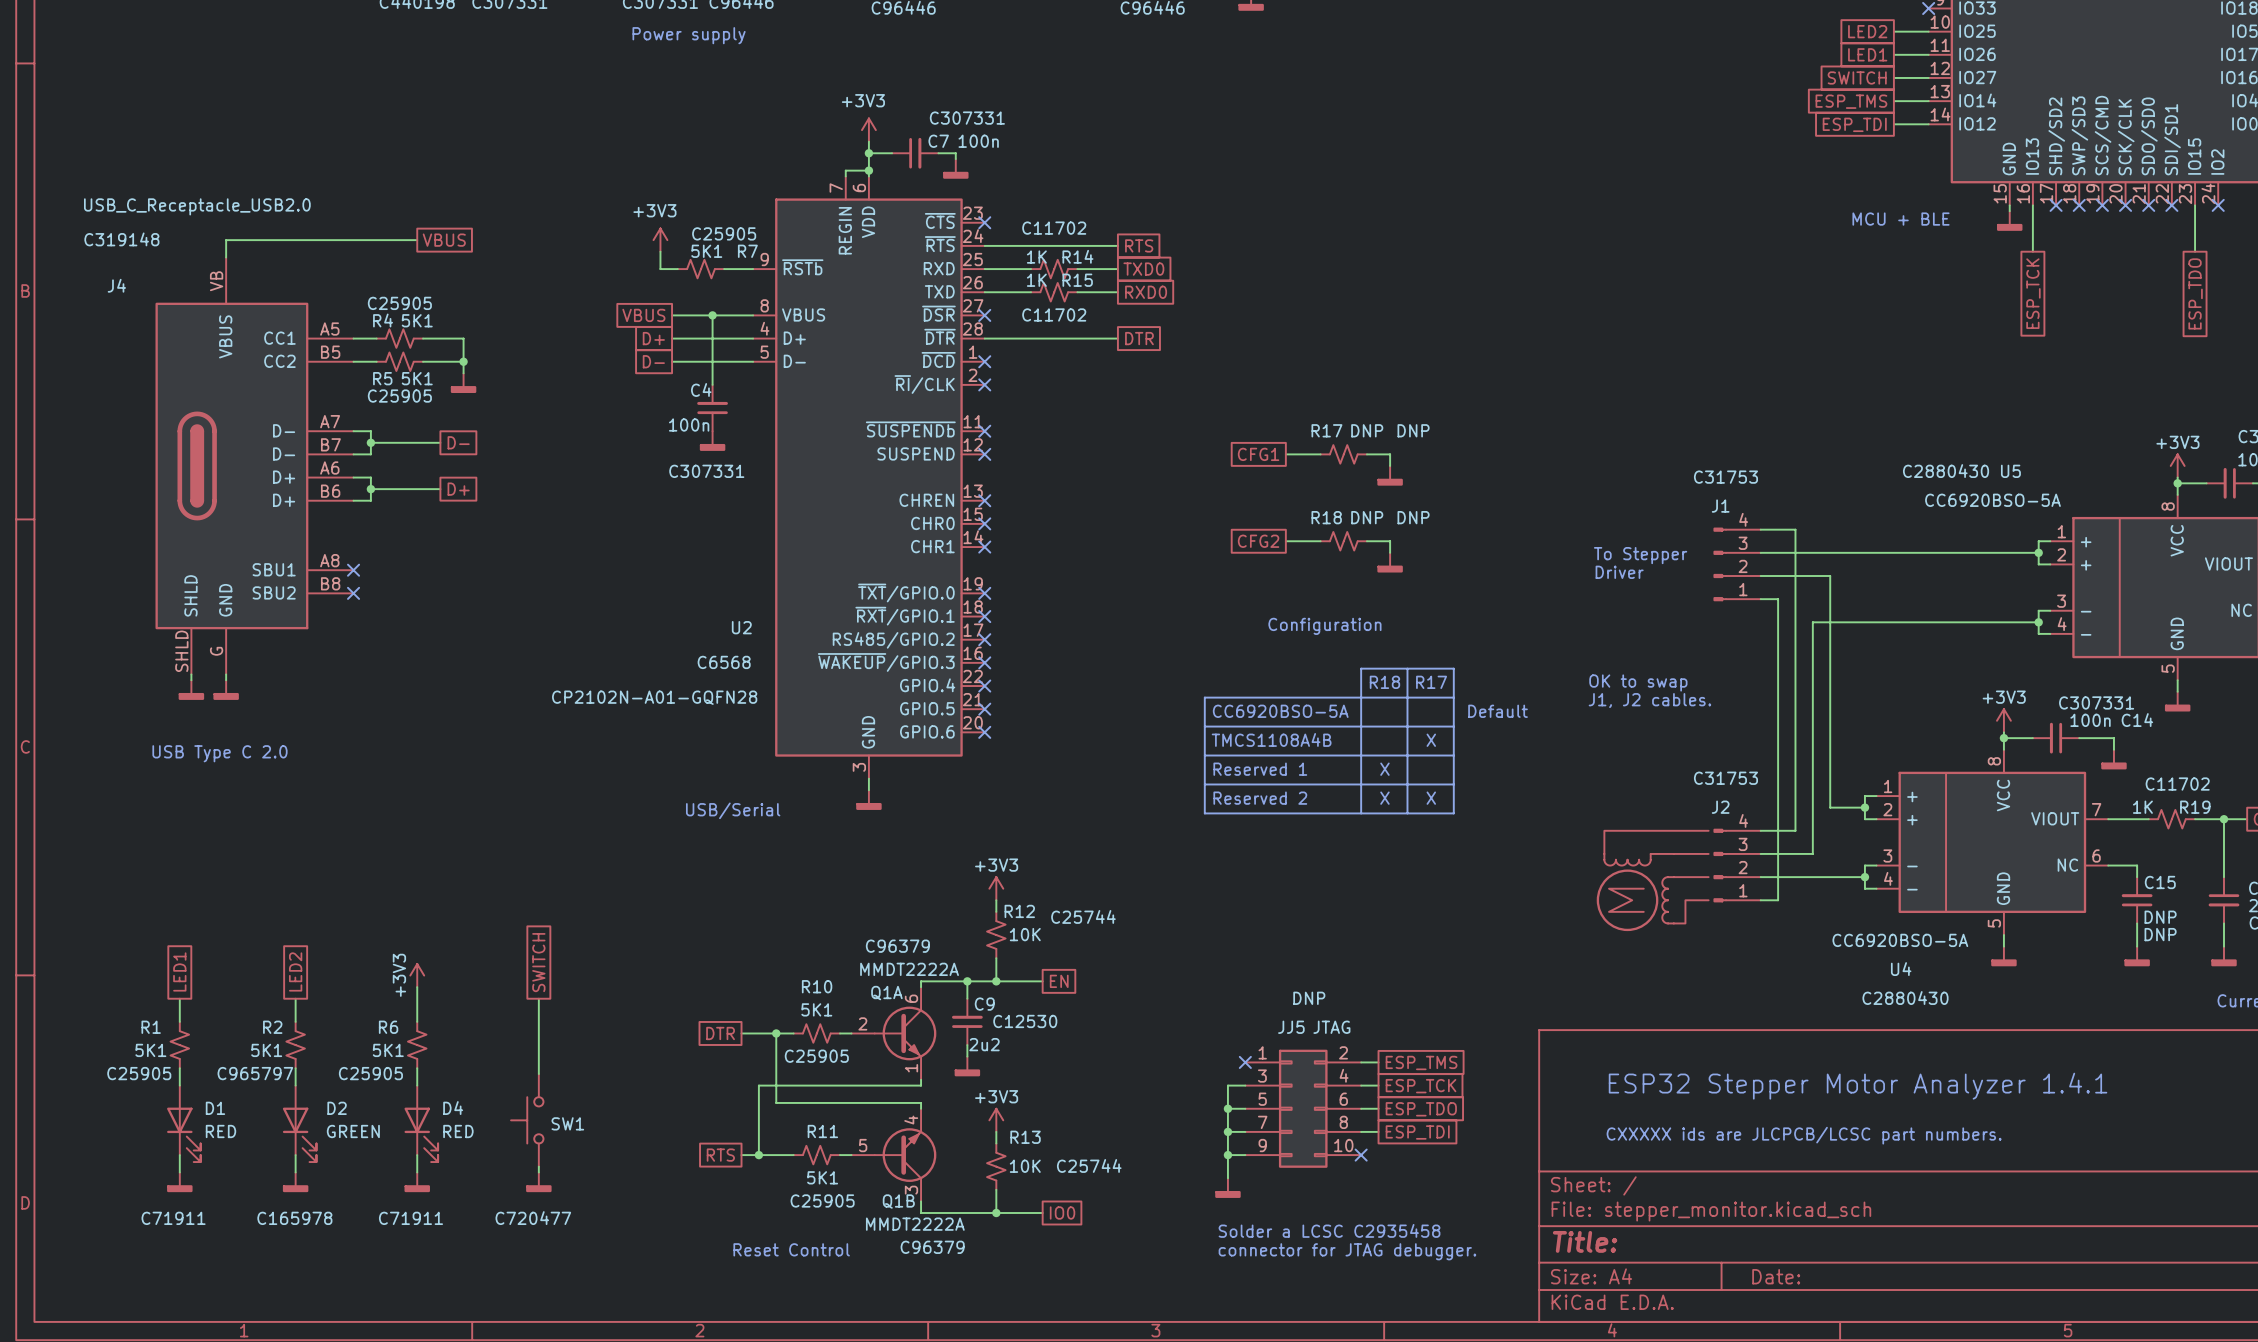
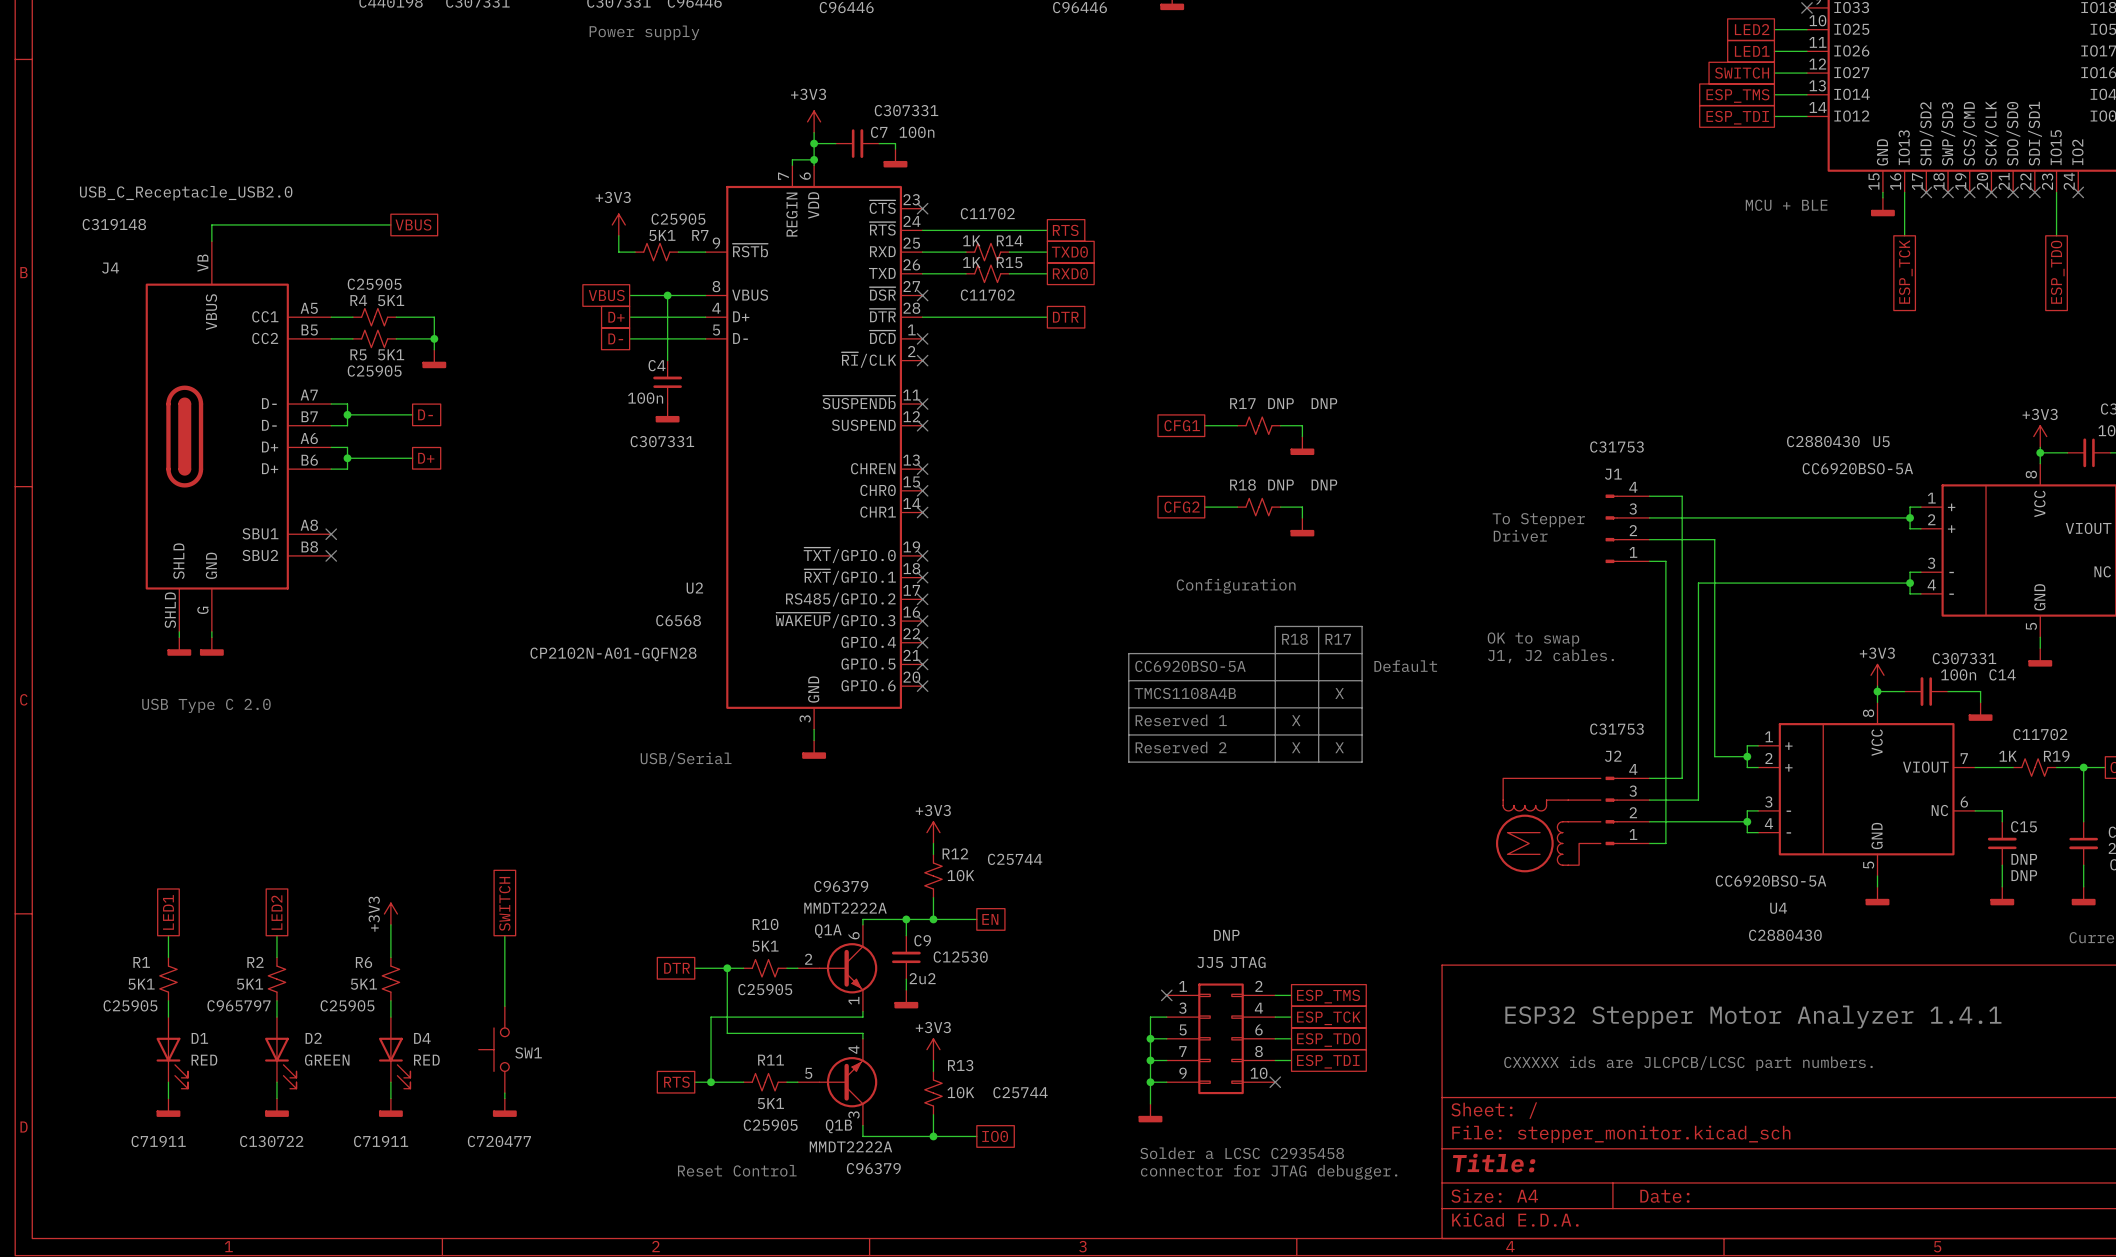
D2 text: C165978 (294, 1218) -> C130722 (271, 1141)

